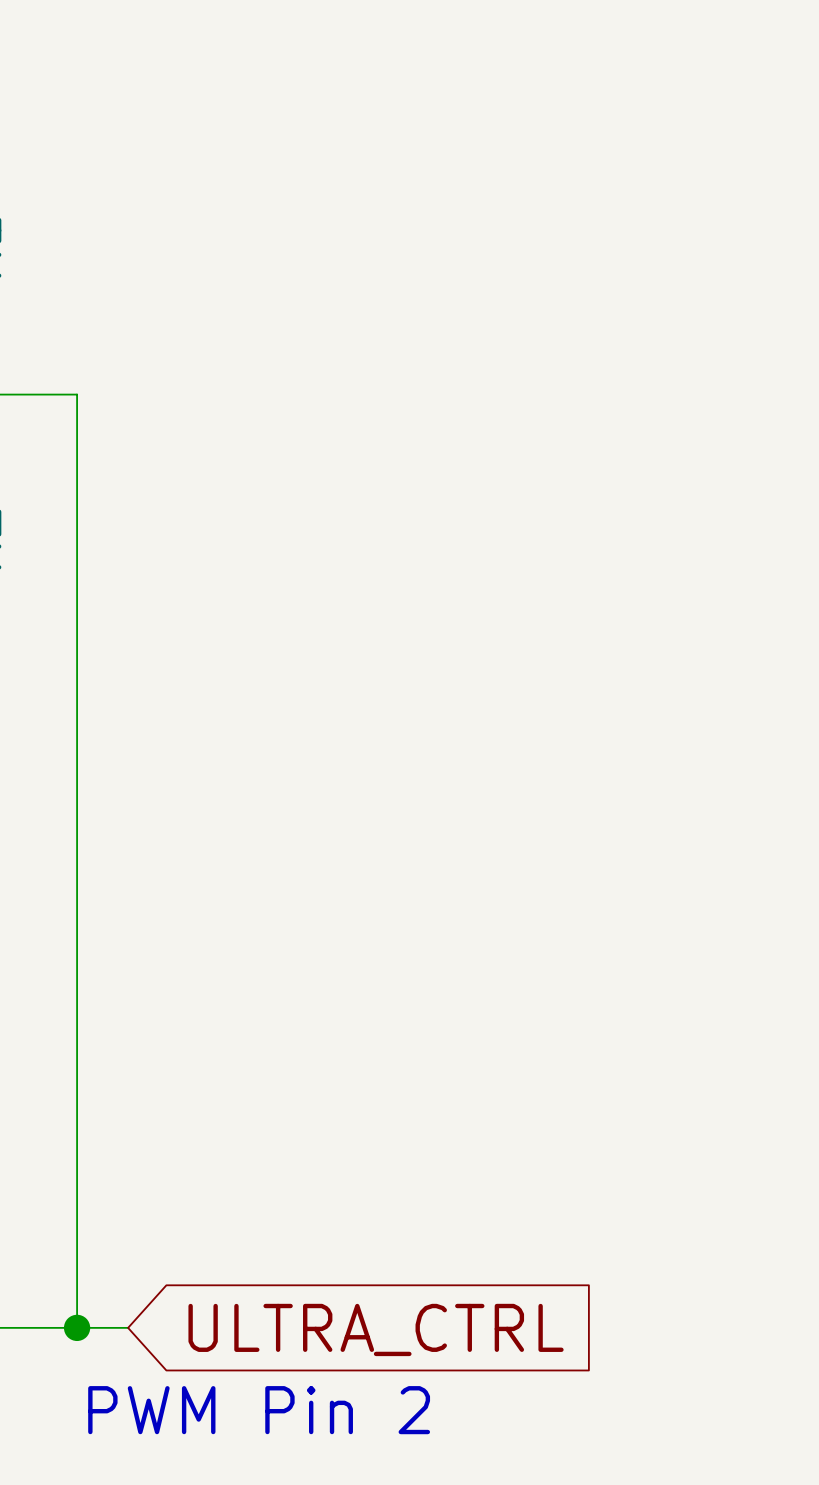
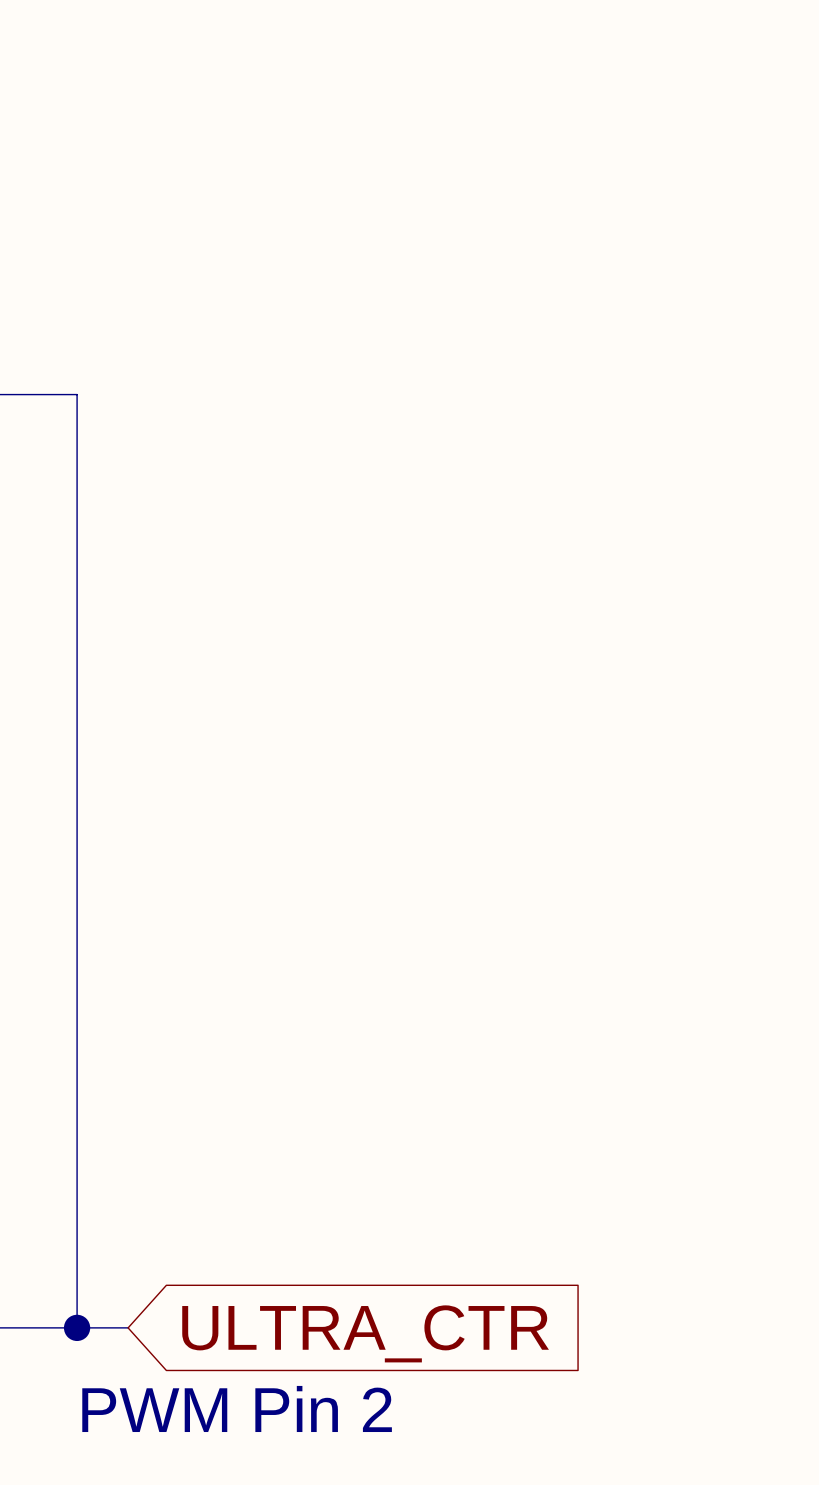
global label: ULTRA_CTRL (376, 1329) -> ULTRA_CTR (365, 1333)

